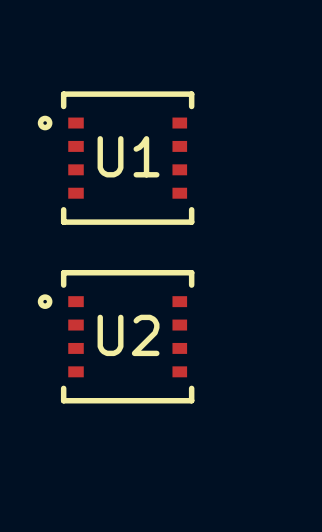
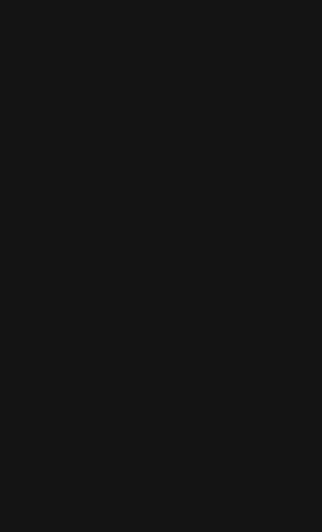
U1: (116, 158) -> none
U2: (116, 336) -> none

